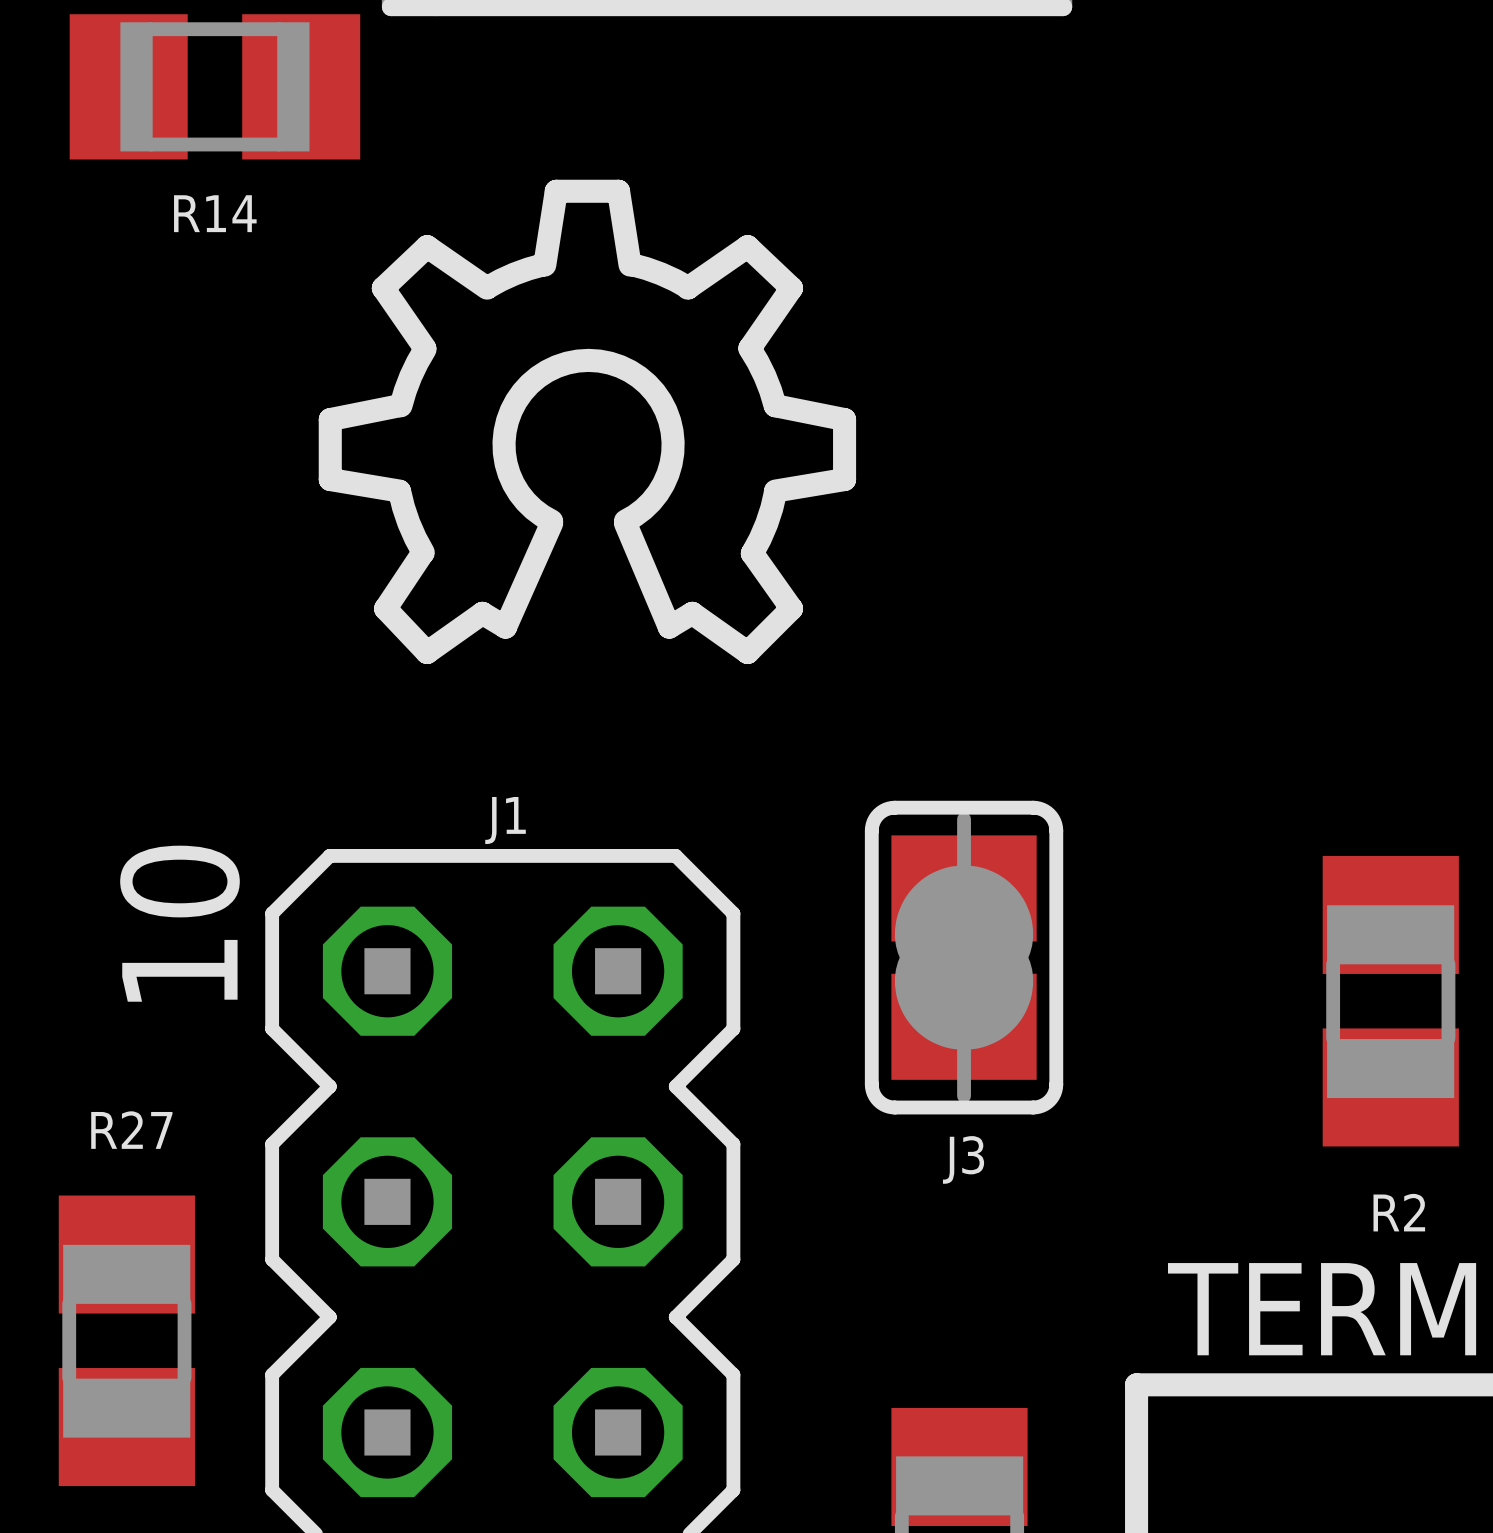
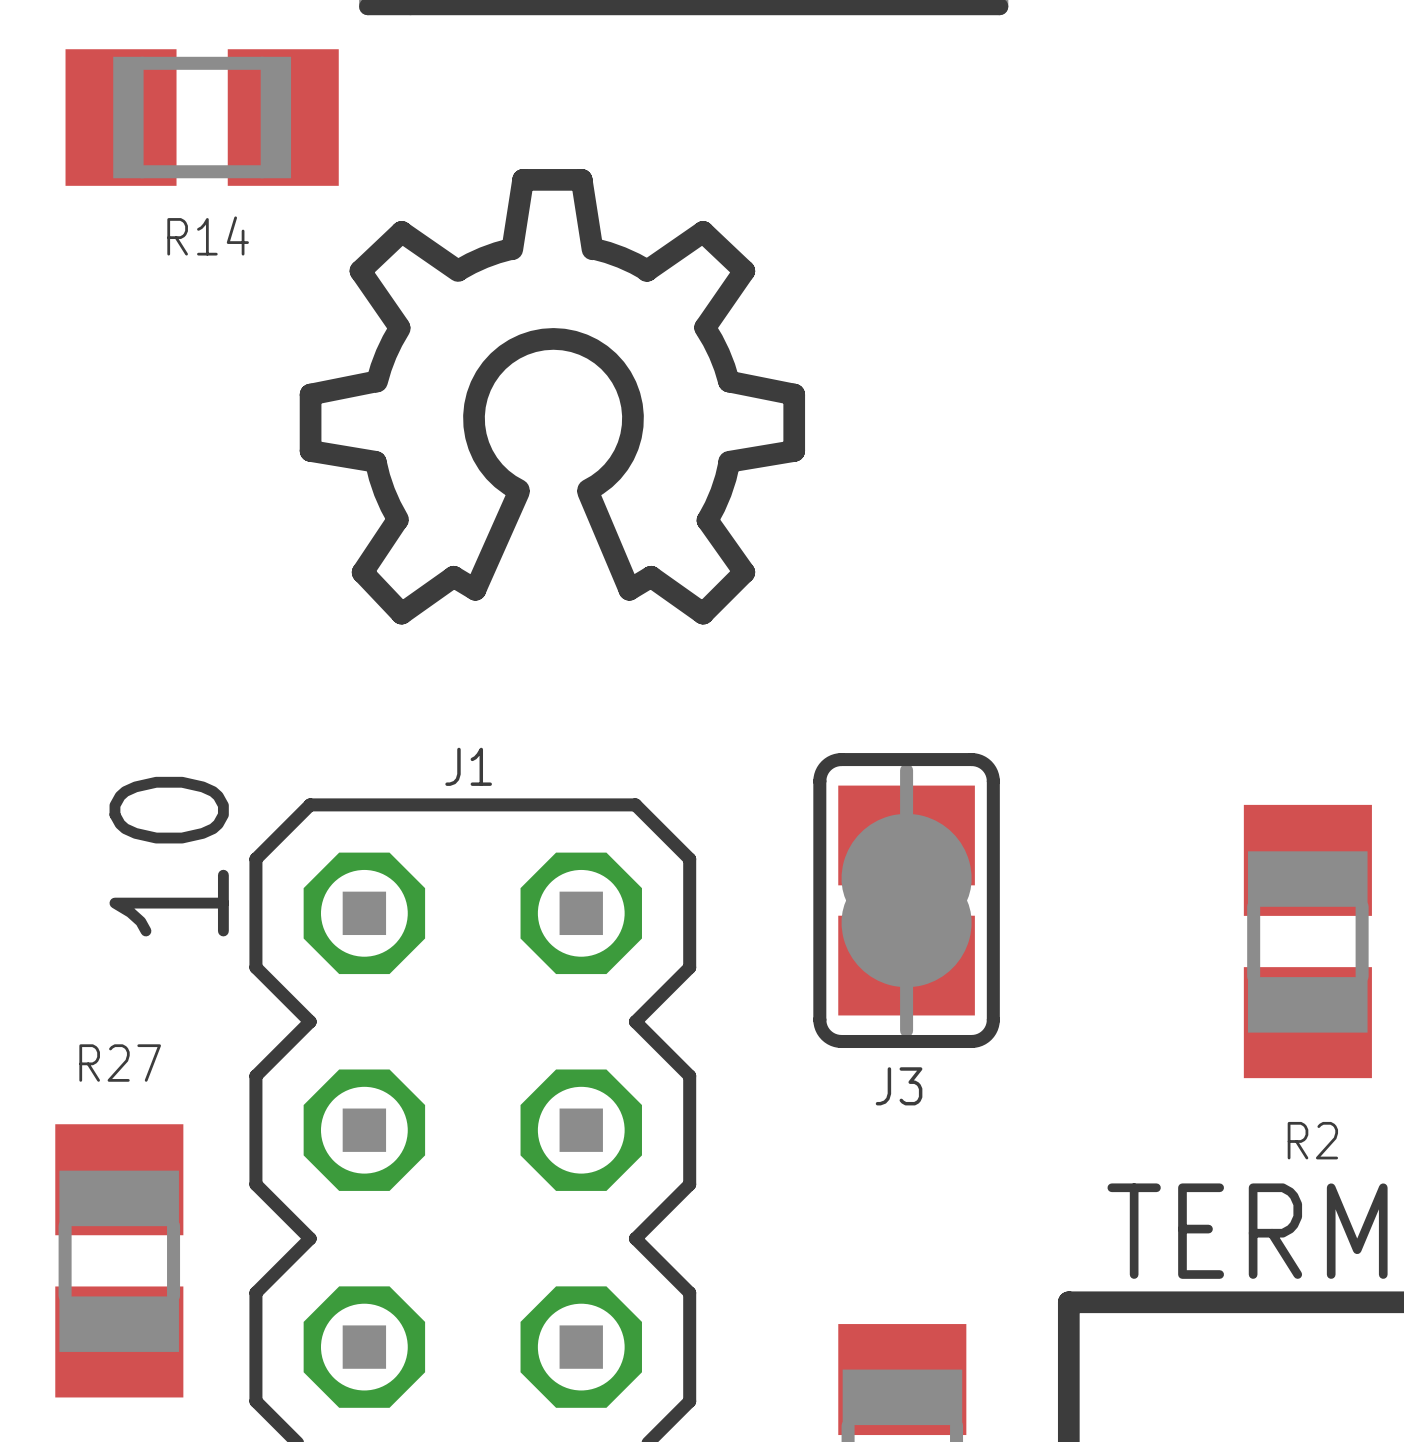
R14 position: (214, 86) -> (202, 117)

